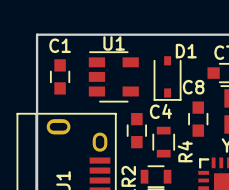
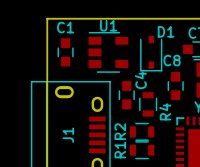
C4 name rotation: 0° (160, 111) -> 90° counterclockwise (140, 80)

